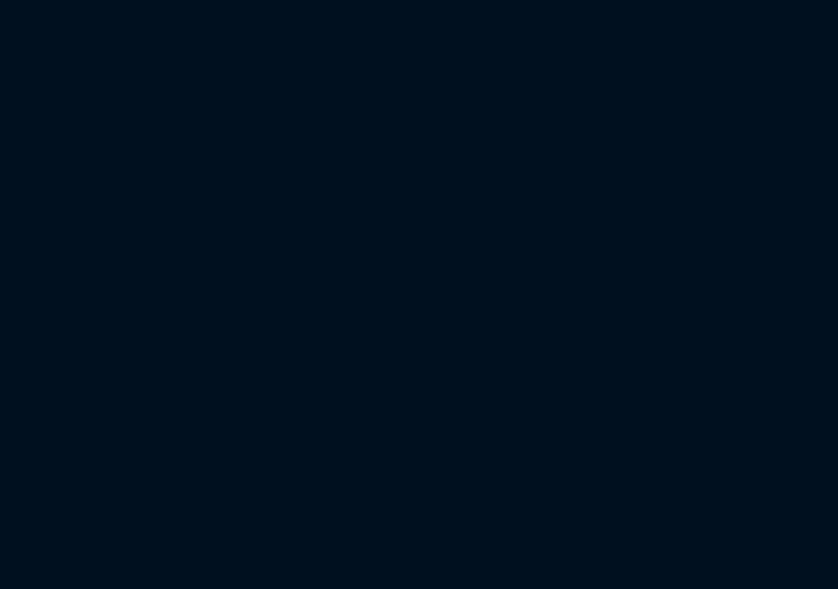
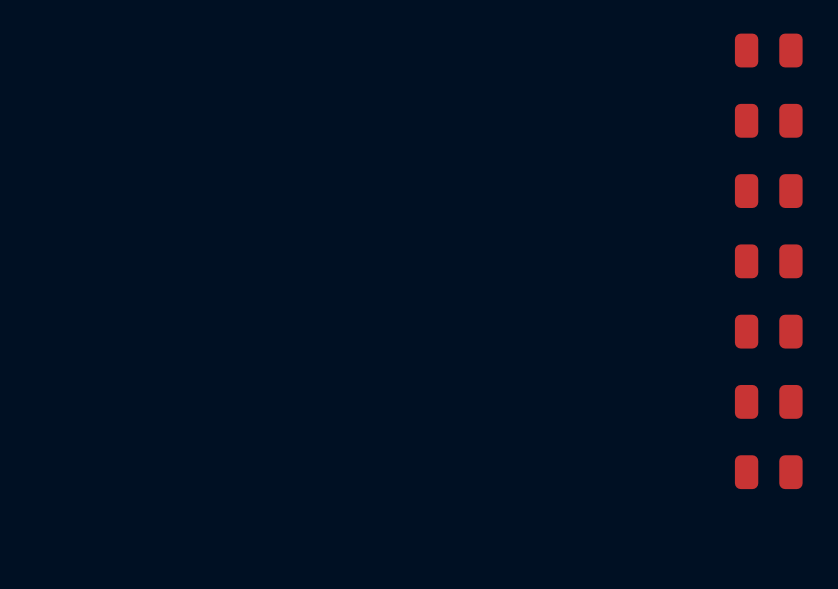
part: none -> (768, 50)
part: none -> (768, 120)
part: none -> (768, 191)
part: none -> (768, 261)
part: none -> (768, 331)
part: none -> (768, 401)
part: none -> (768, 472)

